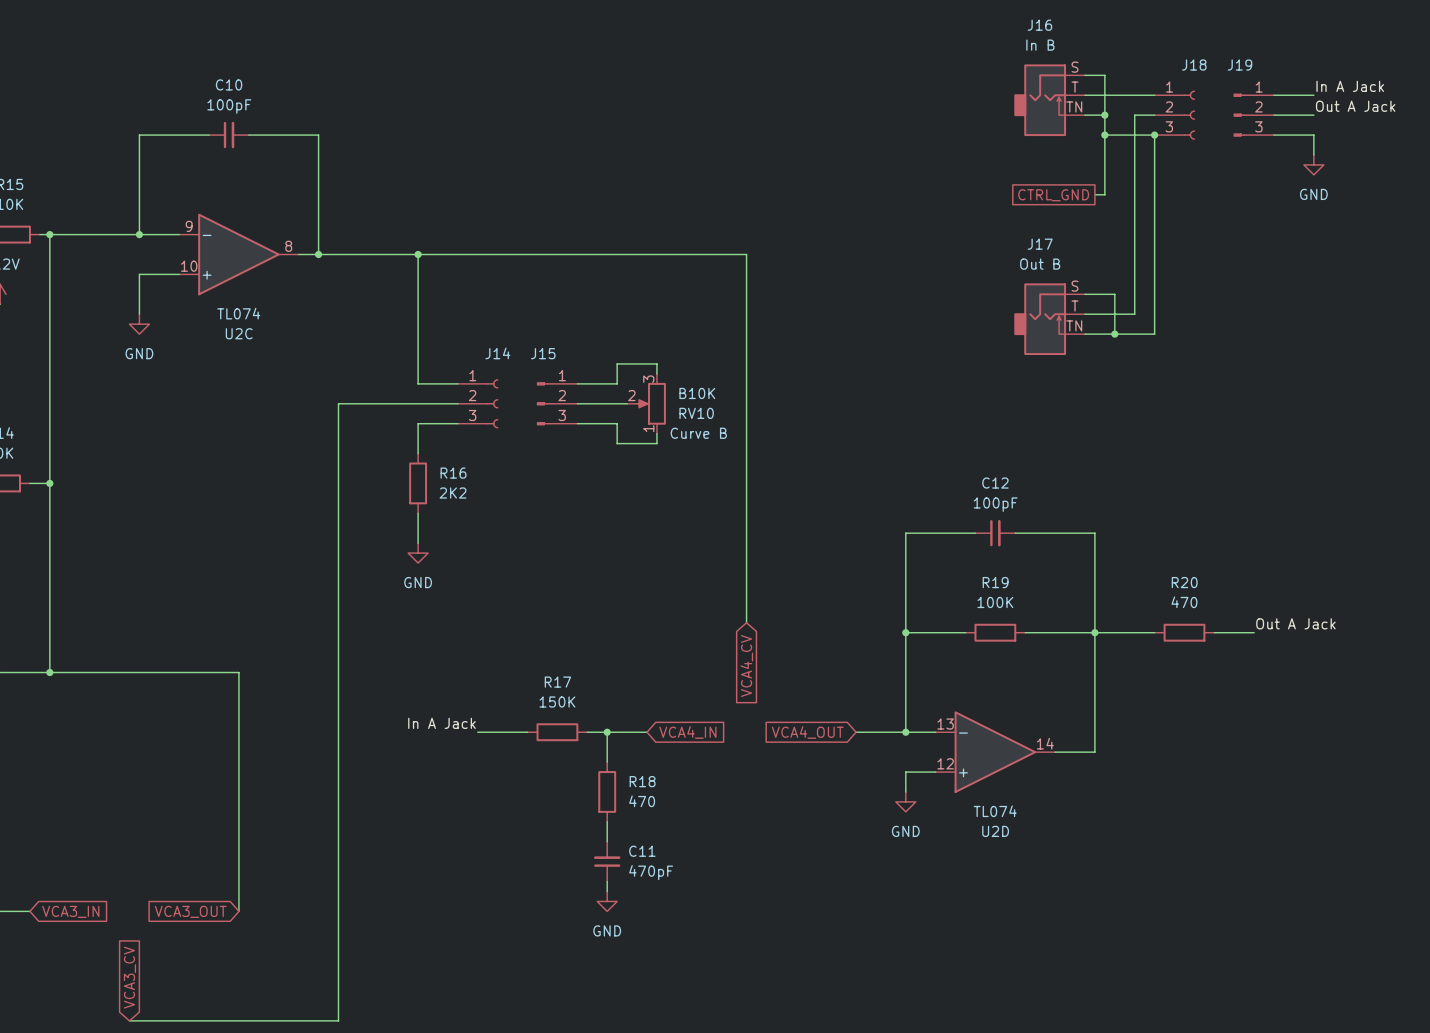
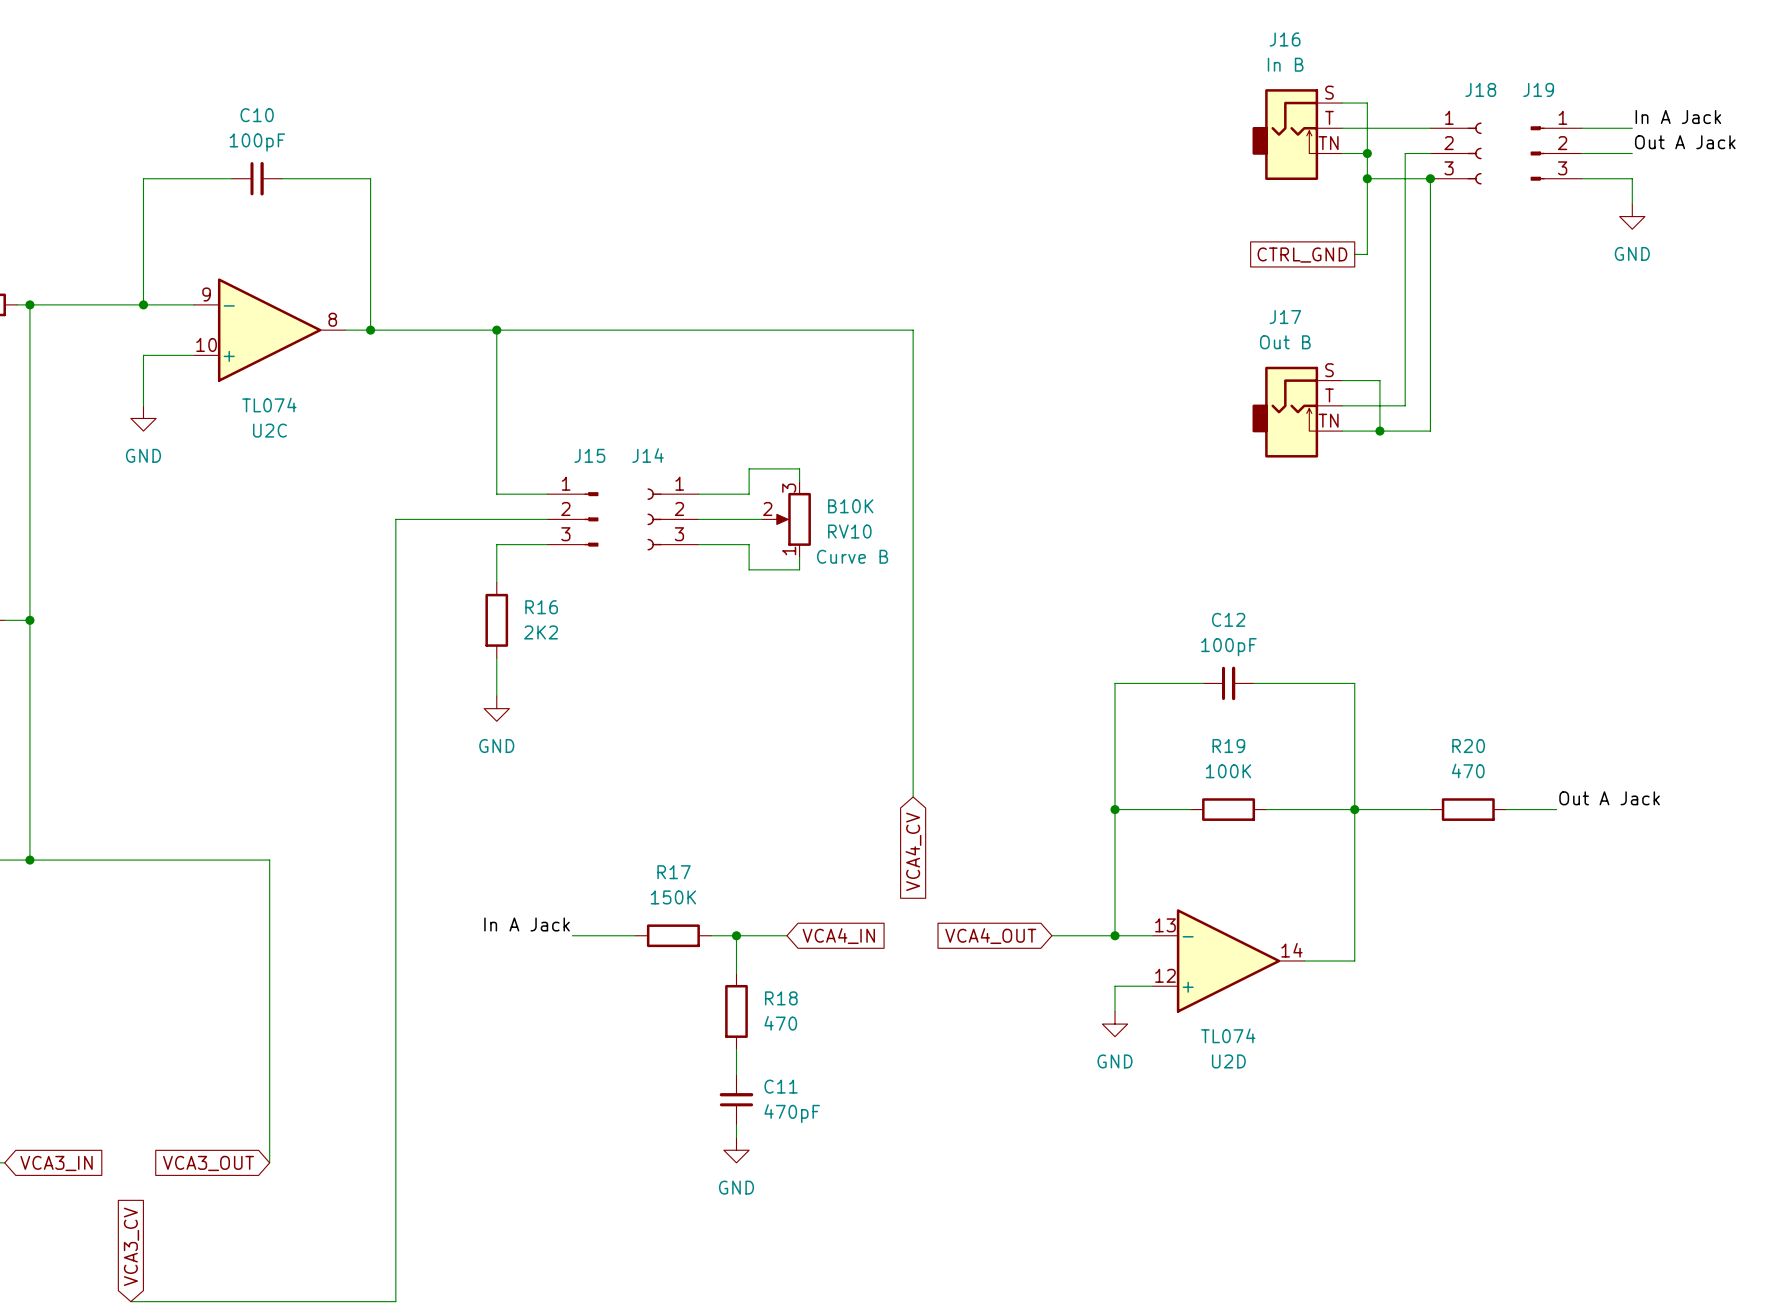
J14 position: (478, 403) -> (673, 519)
J14 flip: as is (492, 403) -> left-right (654, 519)
J15 flip: as is (542, 403) -> left-right (591, 519)
J15 position: (557, 403) -> (572, 519)

